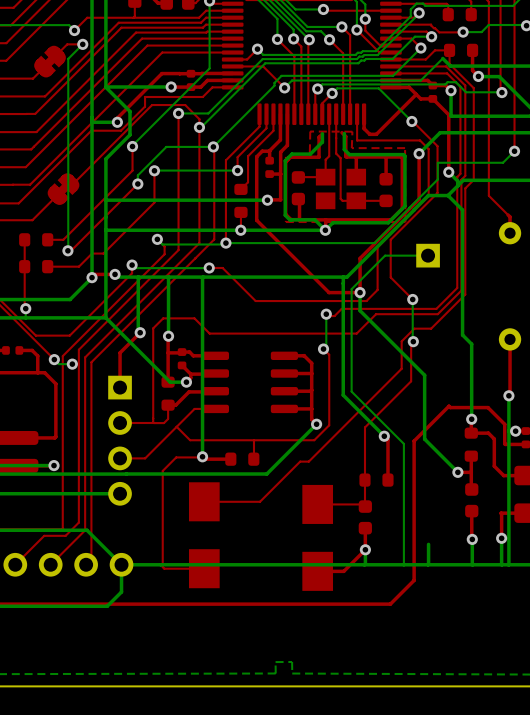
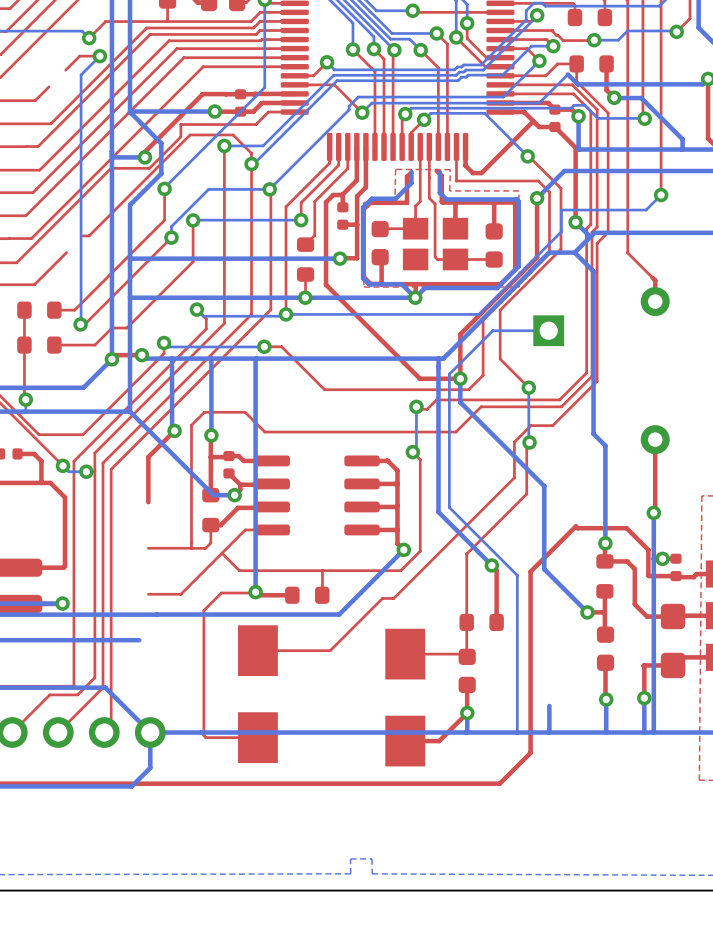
part: (50, 61) -> none
part: (63, 189) -> none
part: (120, 440) -> none

